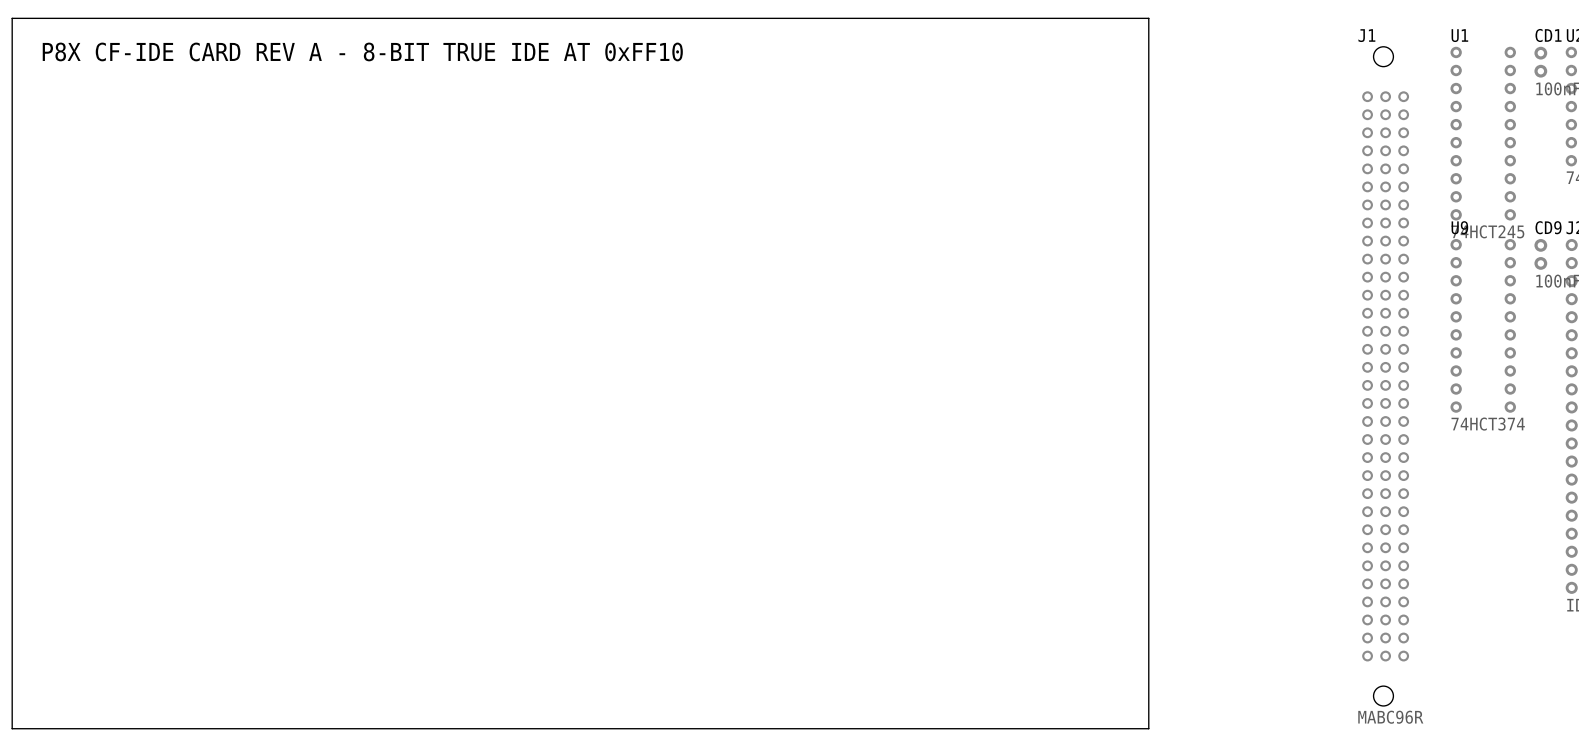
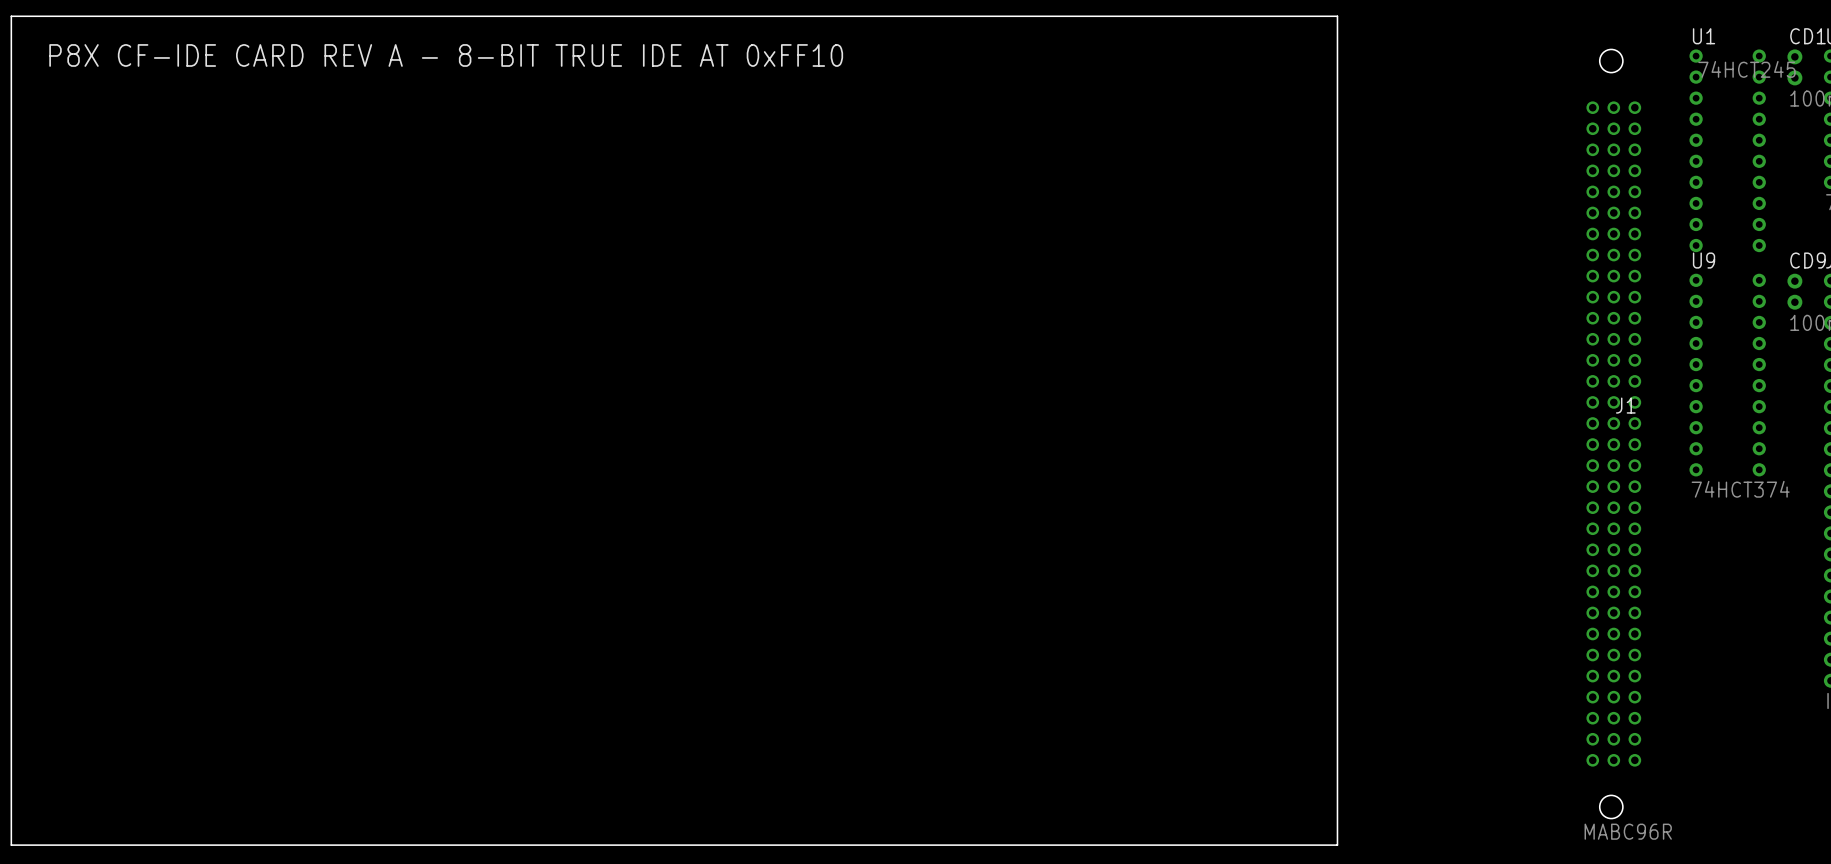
J1 name position: J1 (1366, 35) -> J1 (1625, 405)
U1 value position: 74HCT245 (1487, 231) -> 74HCT245 (1746, 69)

